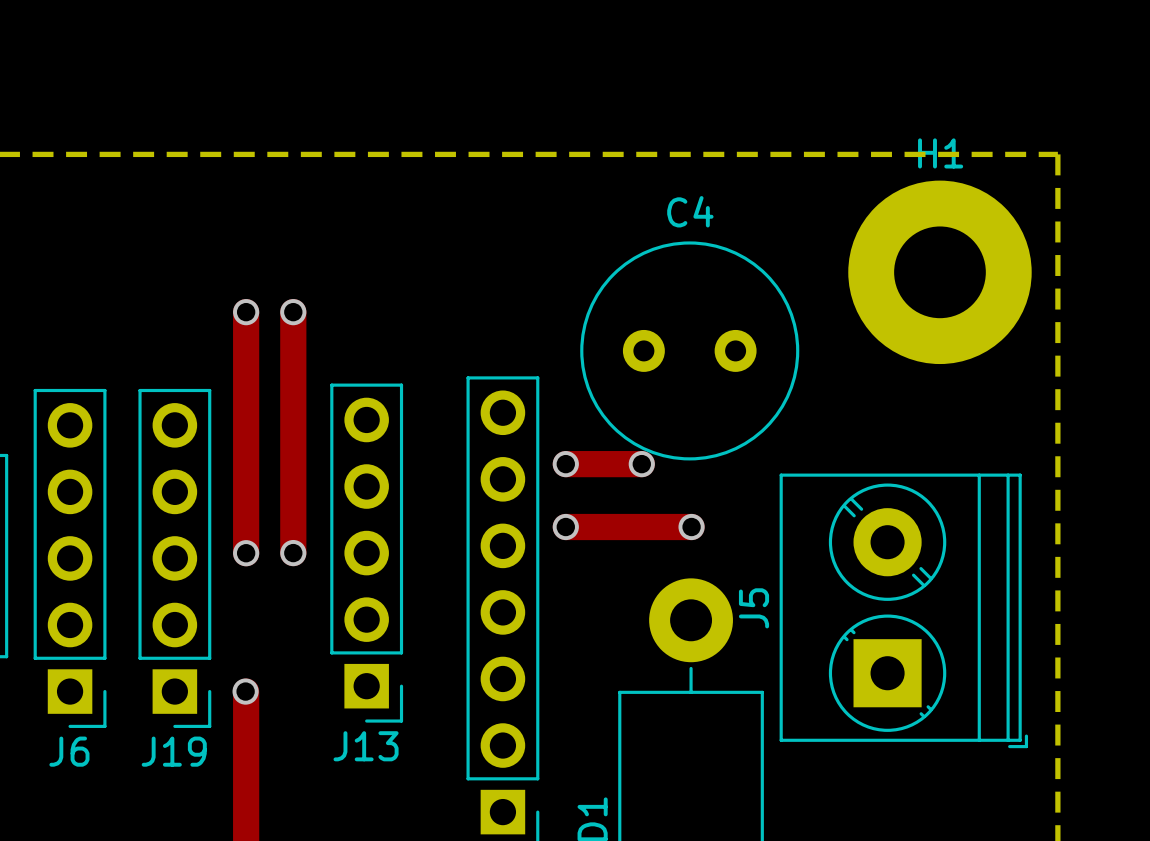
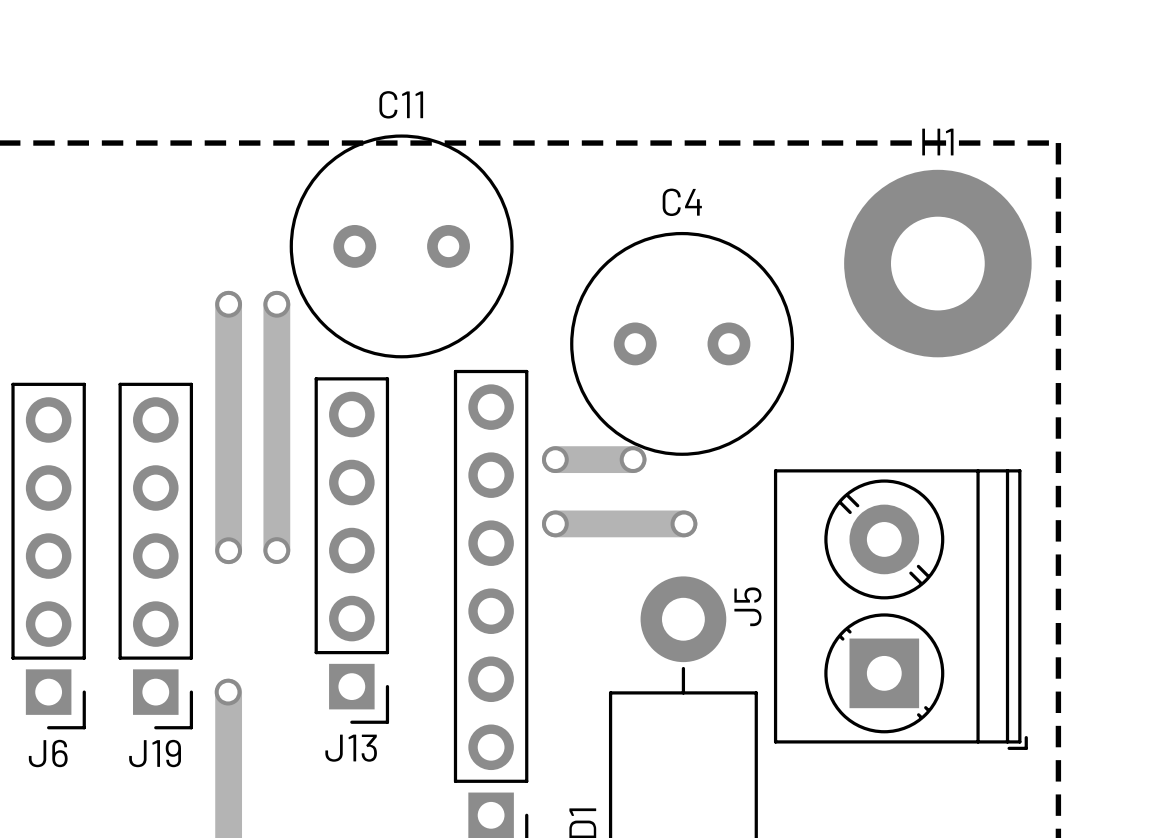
C11: none -> (401, 246)

